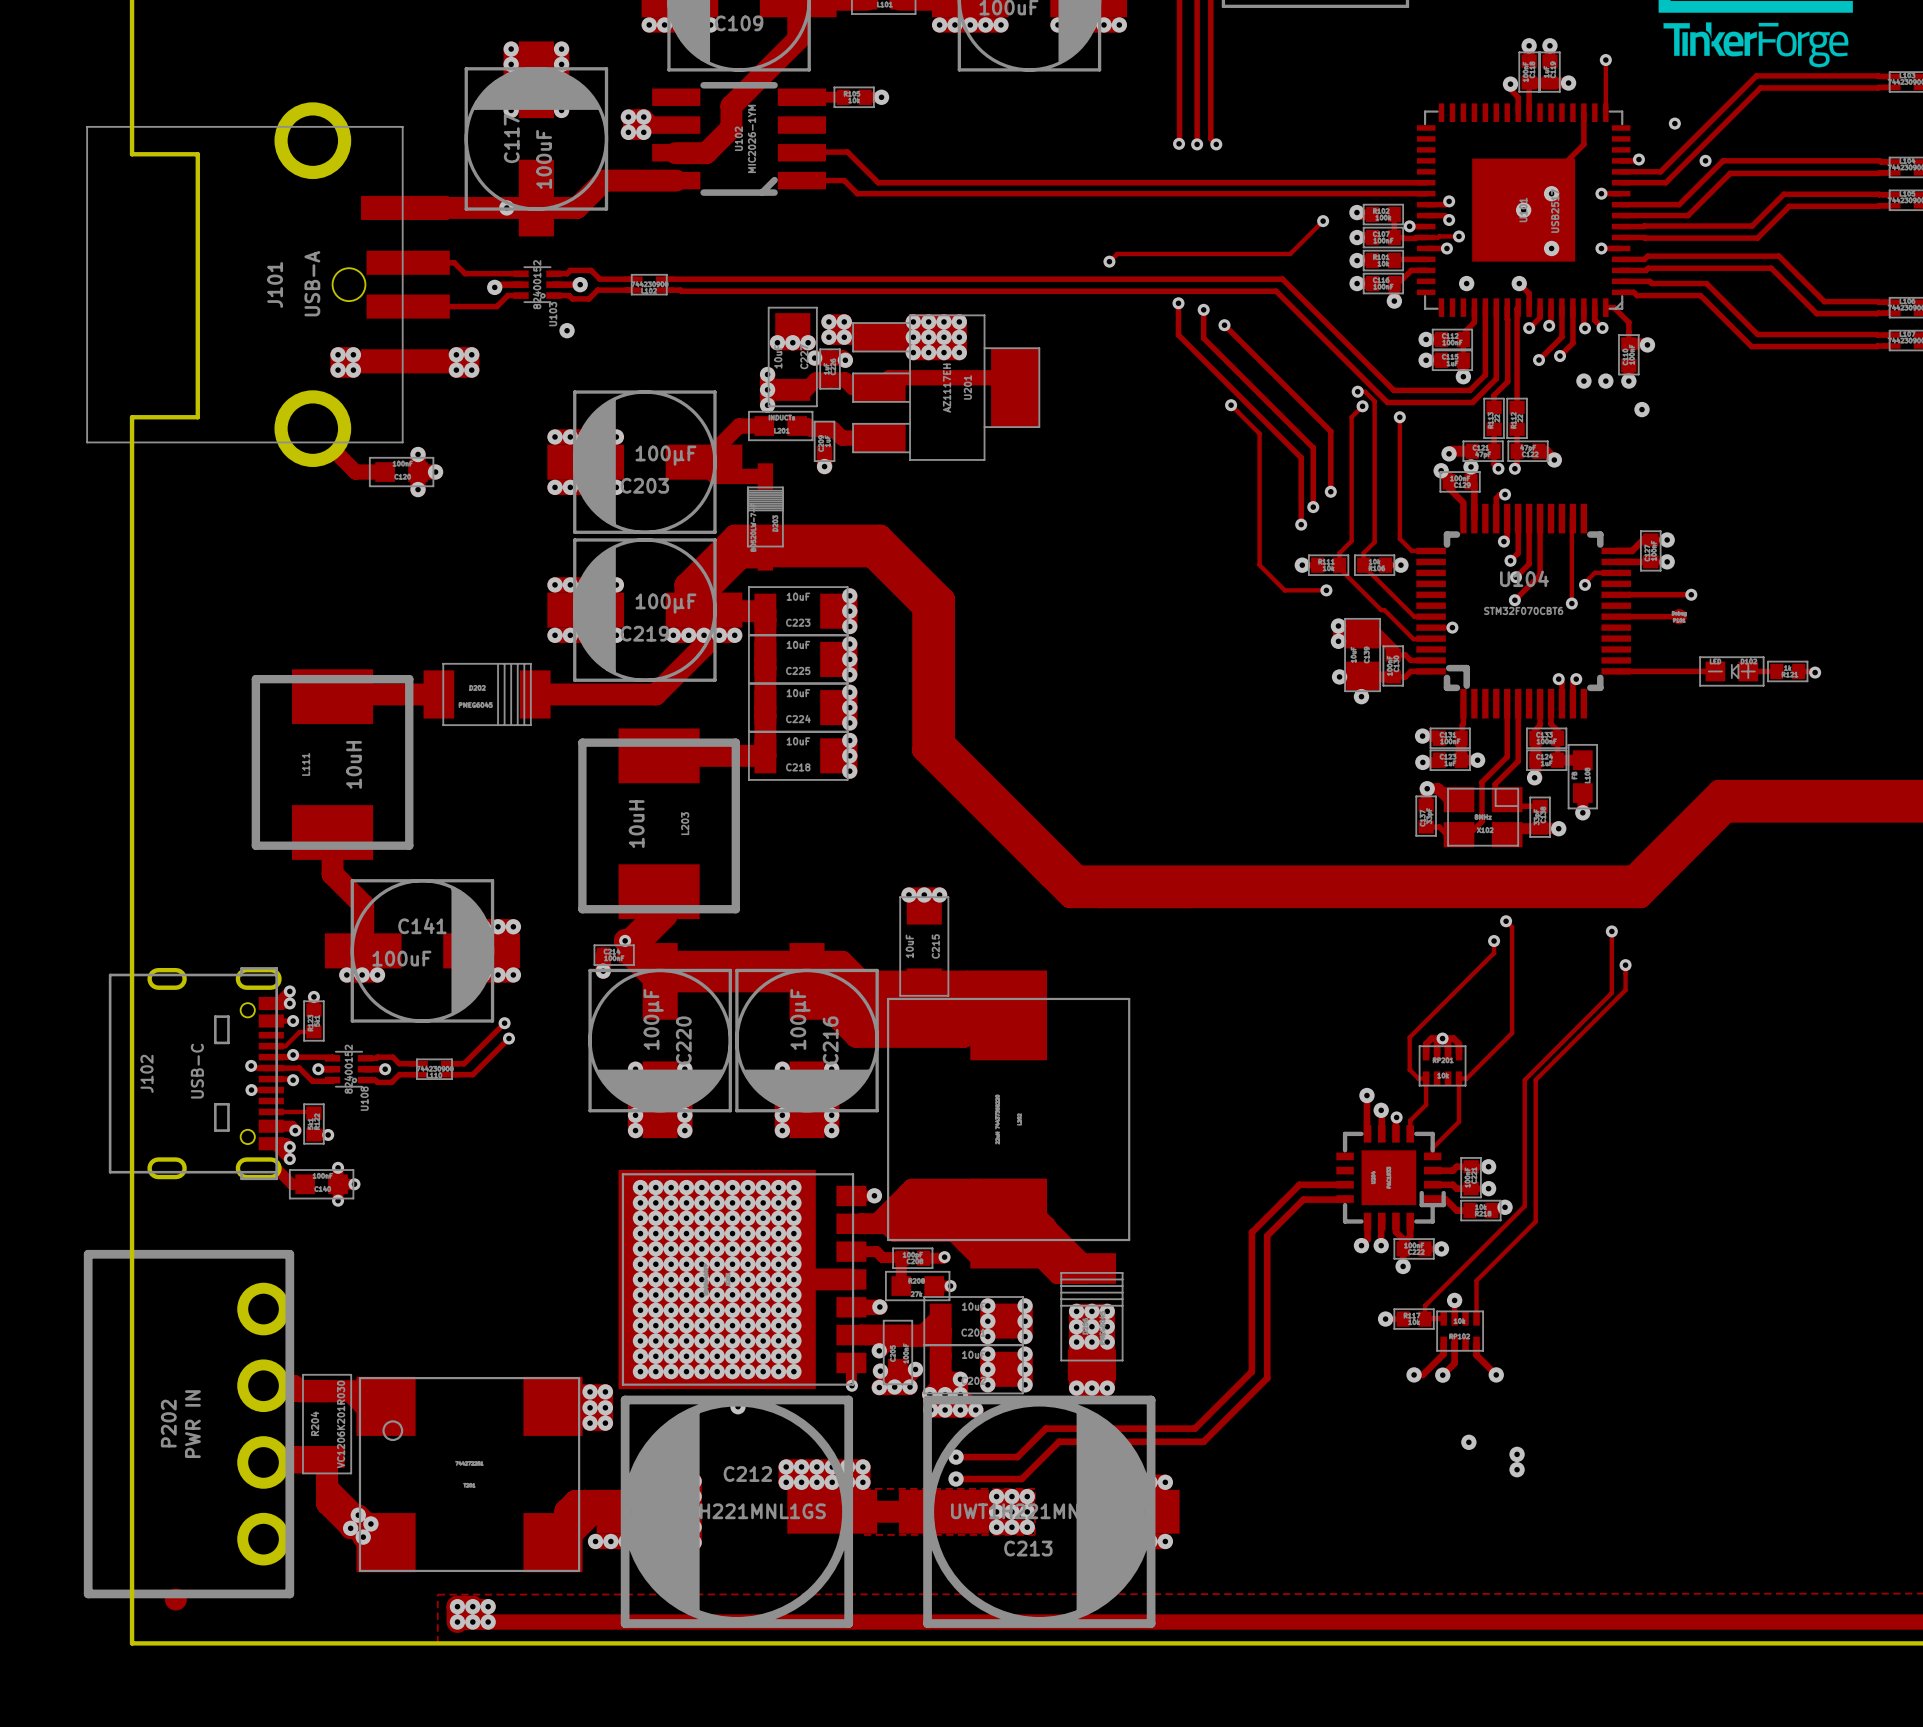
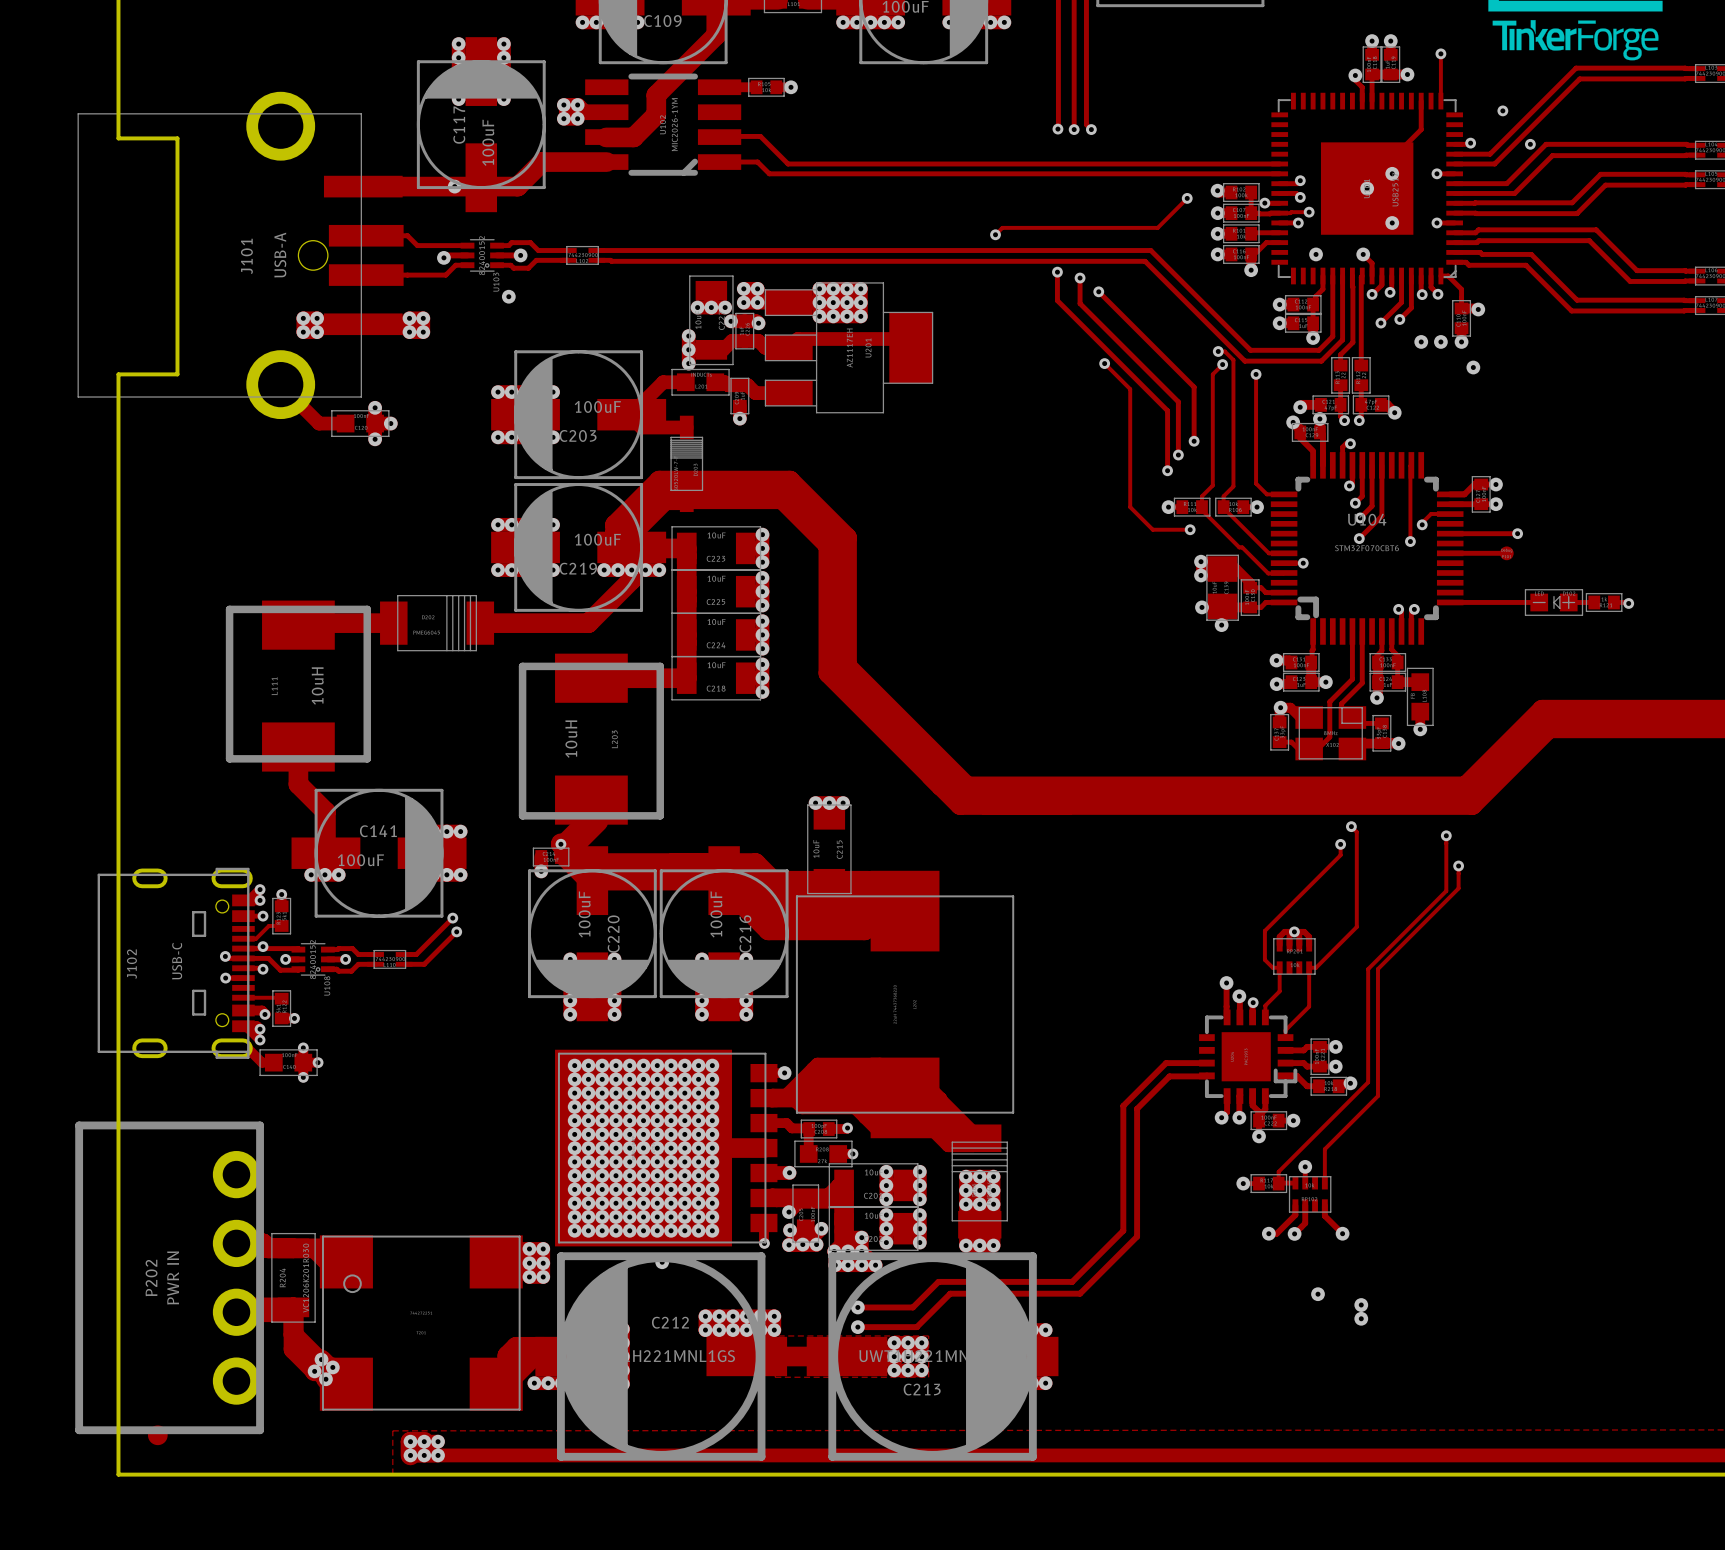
C203 value: 100µF (665, 455) -> 100uF (597, 406)
C219 value: 100µF (665, 603) -> 100uF (597, 539)
C220 value: 100µF (653, 1019) -> 100uF (584, 914)
C216 value: 100µF (800, 1019) -> 100uF (716, 914)

